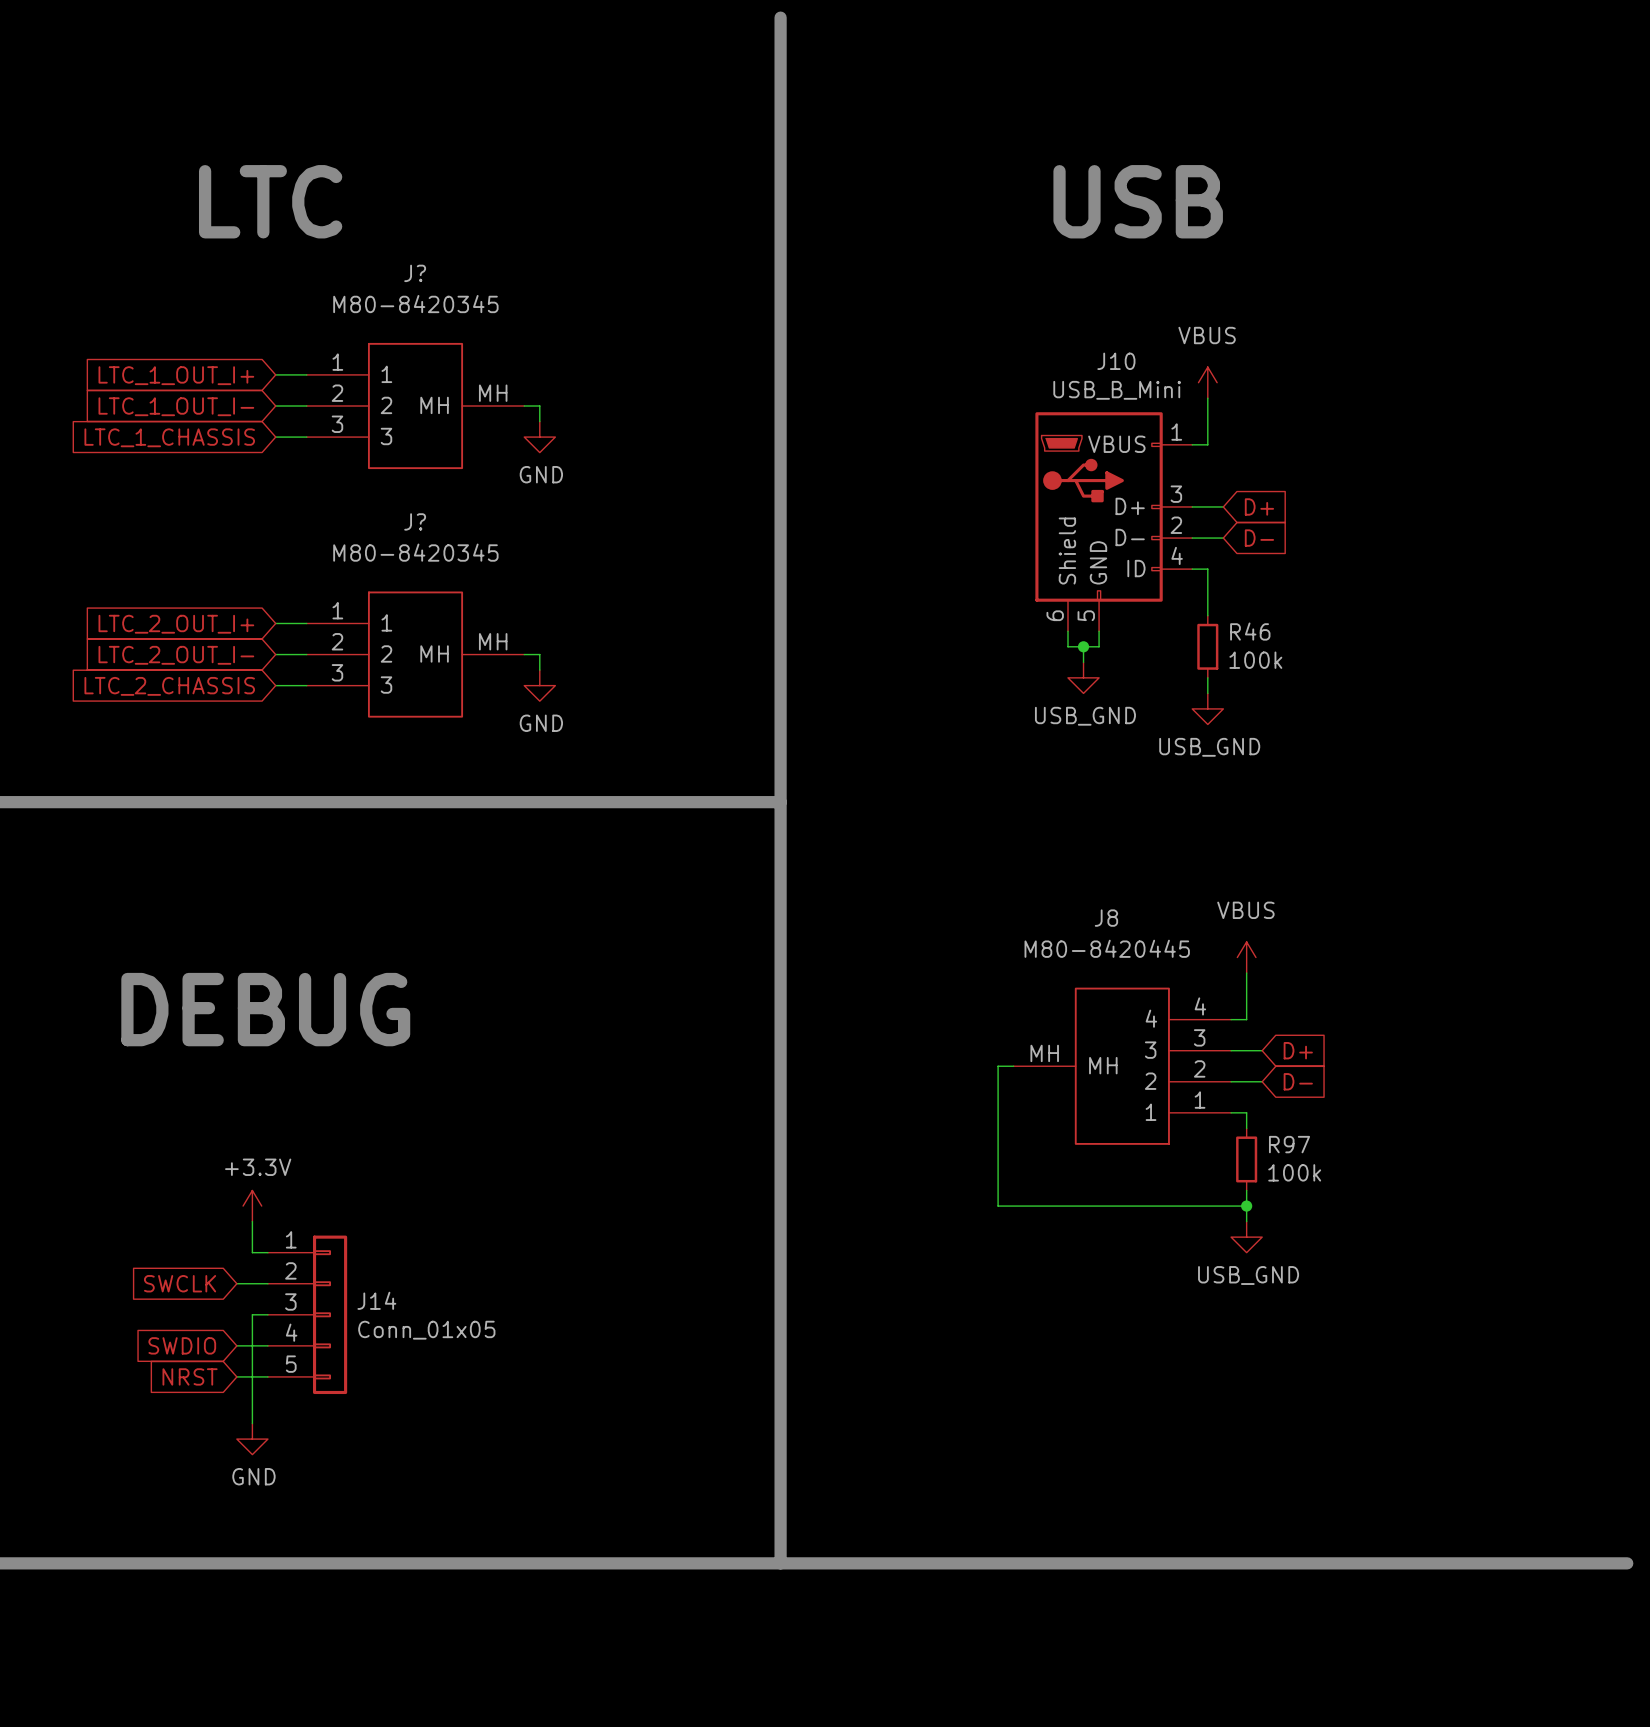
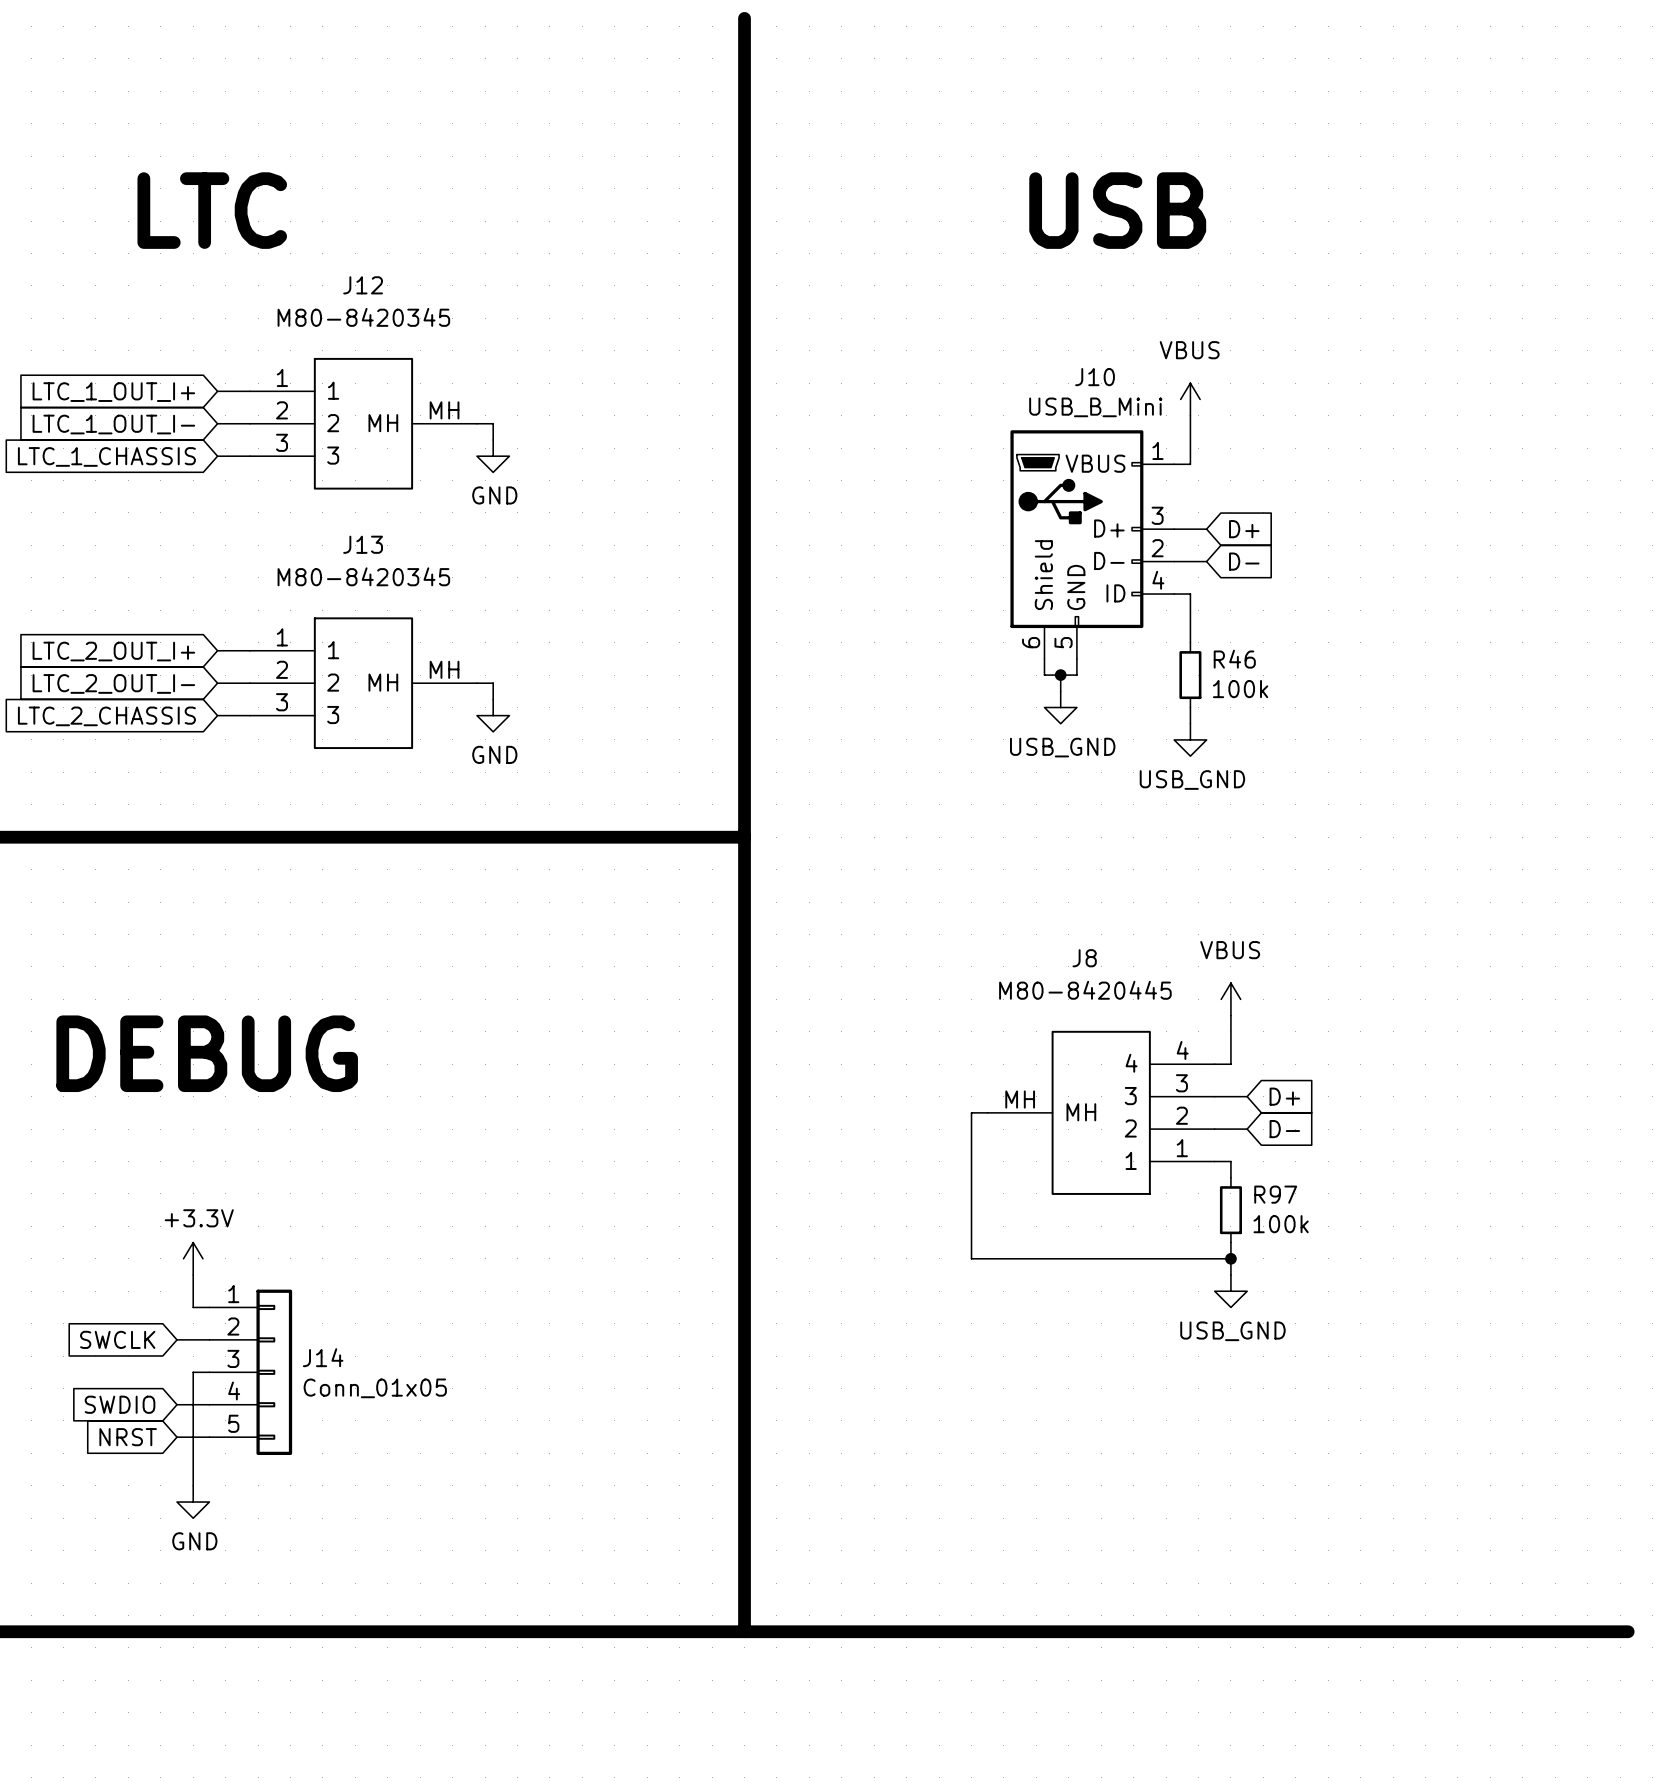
J? name: J? (415, 273) -> J12 (363, 285)
J? name: J? (415, 521) -> J13 (363, 544)

